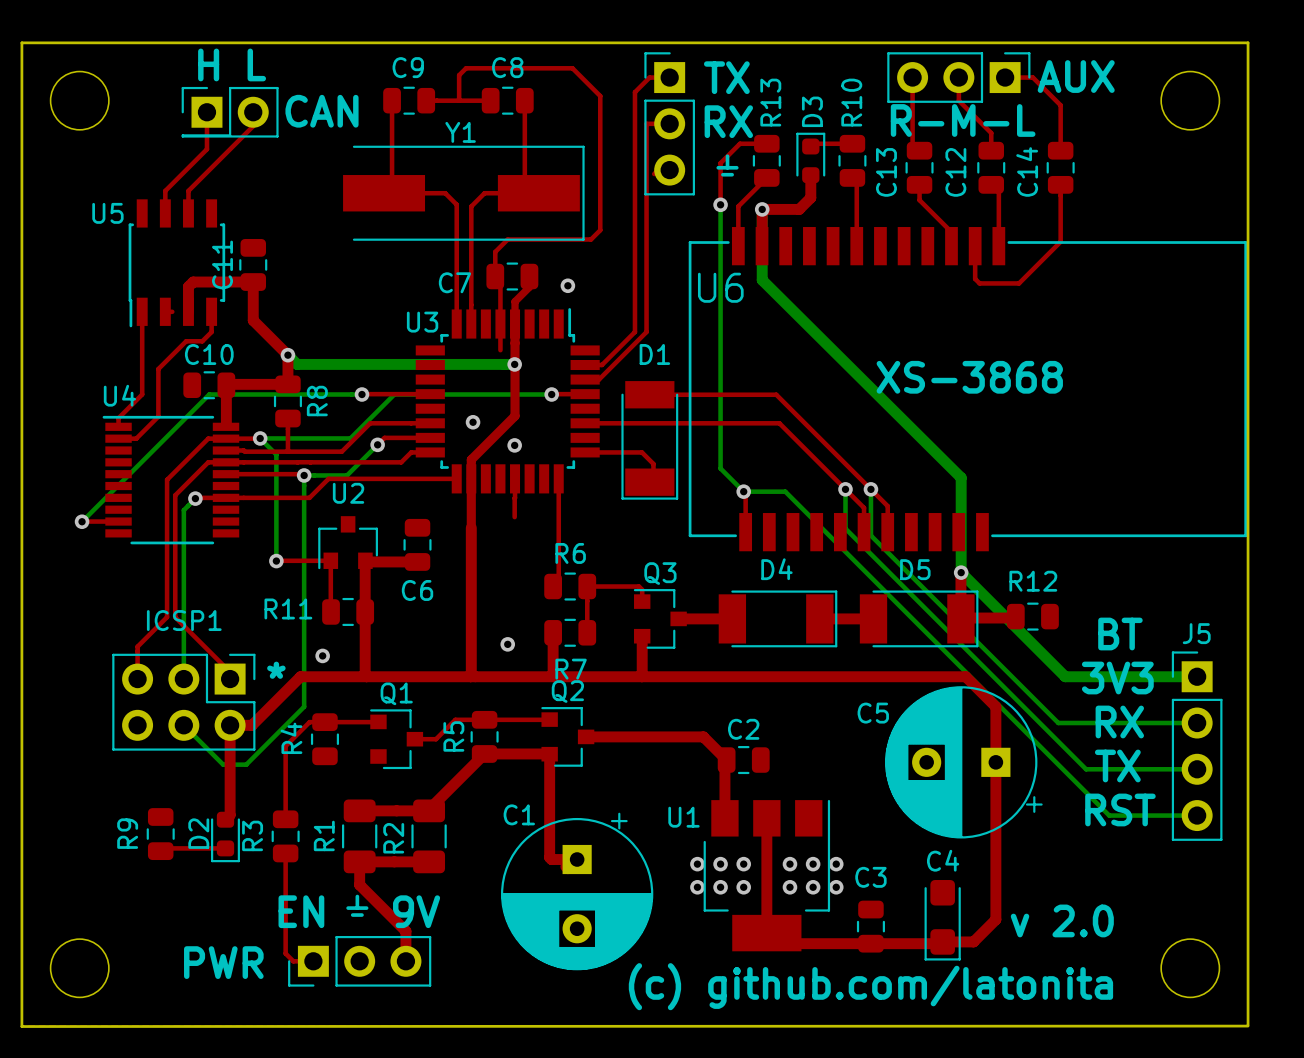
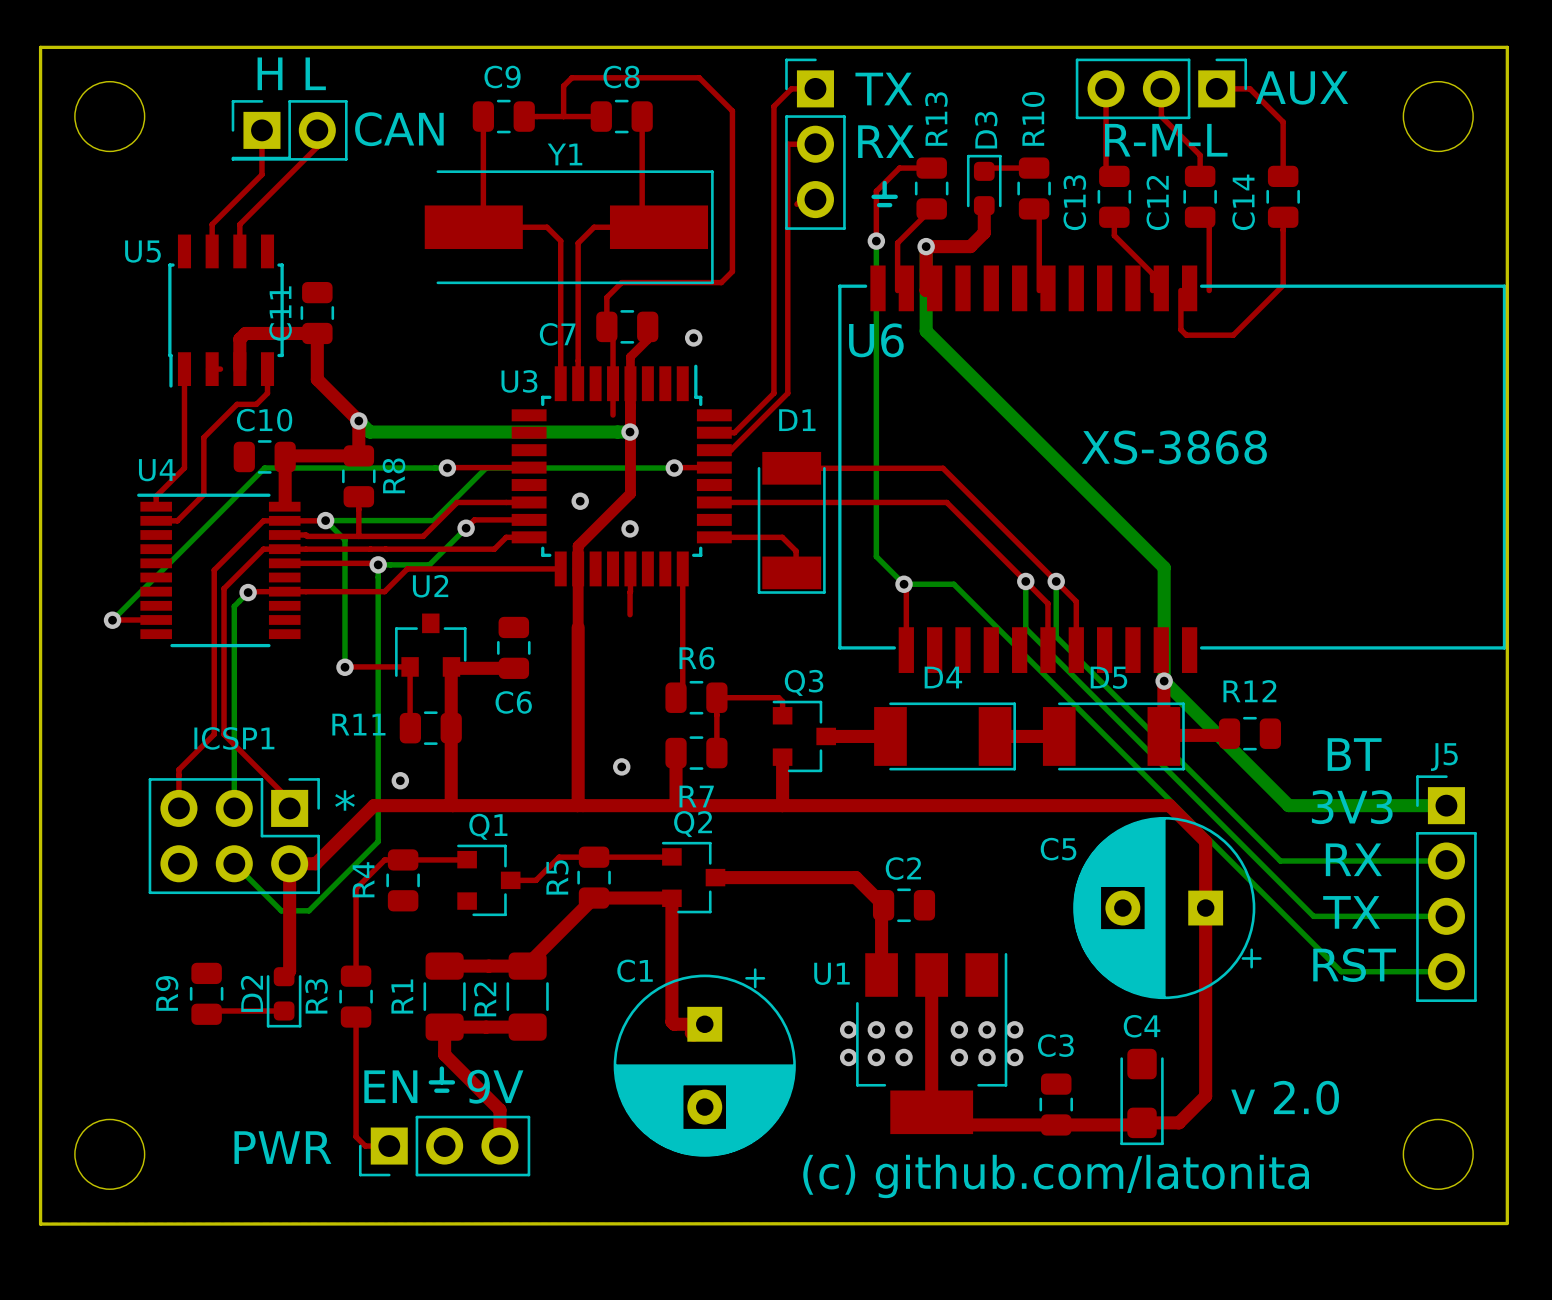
U6 footprint: [688, 227, 1248, 552] -> [838, 265, 1507, 673]

